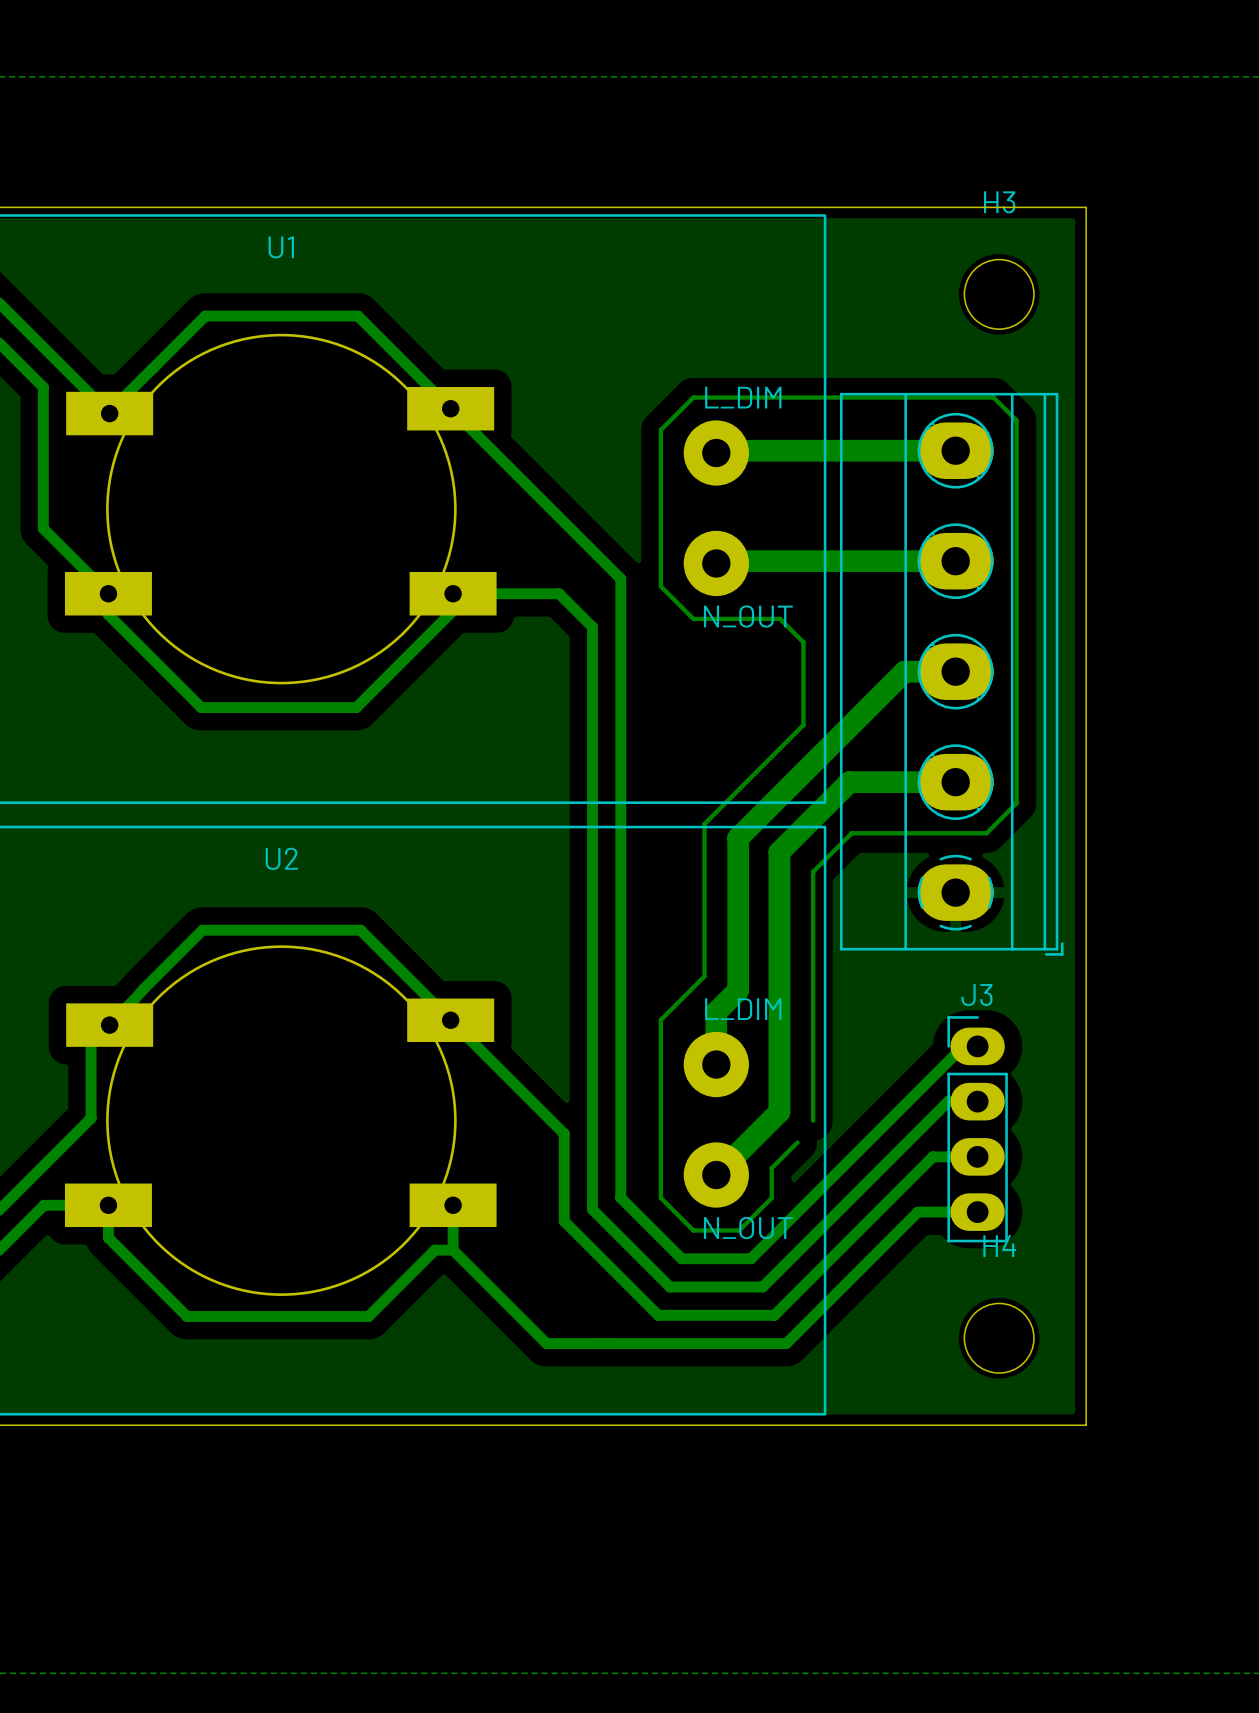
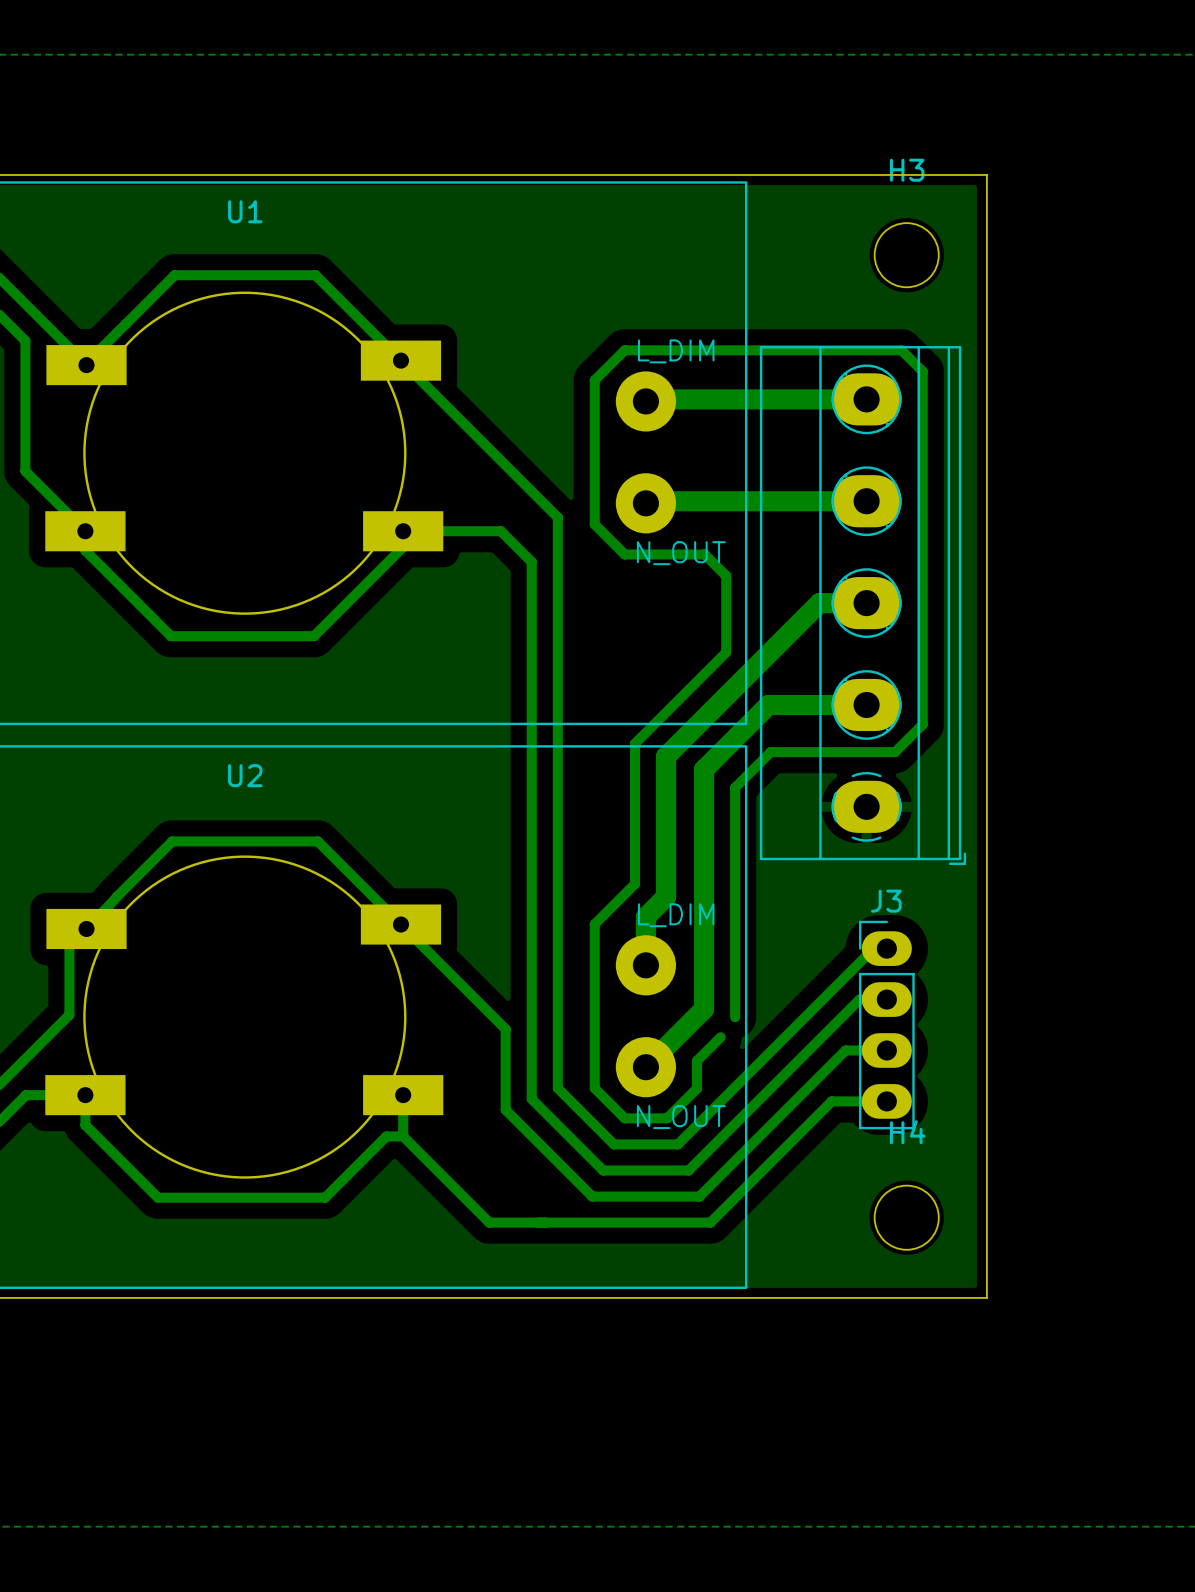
bottom track width: thin (813, 1120) (813, 871) (851, 833) (986, 833) (1016, 803) (1016, 420) (993, 397) (693, 397) (660, 430) (660, 586) (693, 618) (780, 618) (803, 642) (803, 725) (704, 824) (704, 976) (660, 1019) (660, 1197) (693, 1230) (739, 1230) (771, 1197) (771, 1168) (797, 1142) -> thick (735, 1017) (735, 787) (770, 752) (895, 752) (922, 724) (922, 371) (901, 350) (624, 350) (594, 380) (594, 524) (624, 554) (704, 554) (726, 576) (726, 652) (635, 743) (635, 884) (594, 924) (594, 1088) (624, 1118) (667, 1118) (697, 1088) (697, 1060) (720, 1037)

